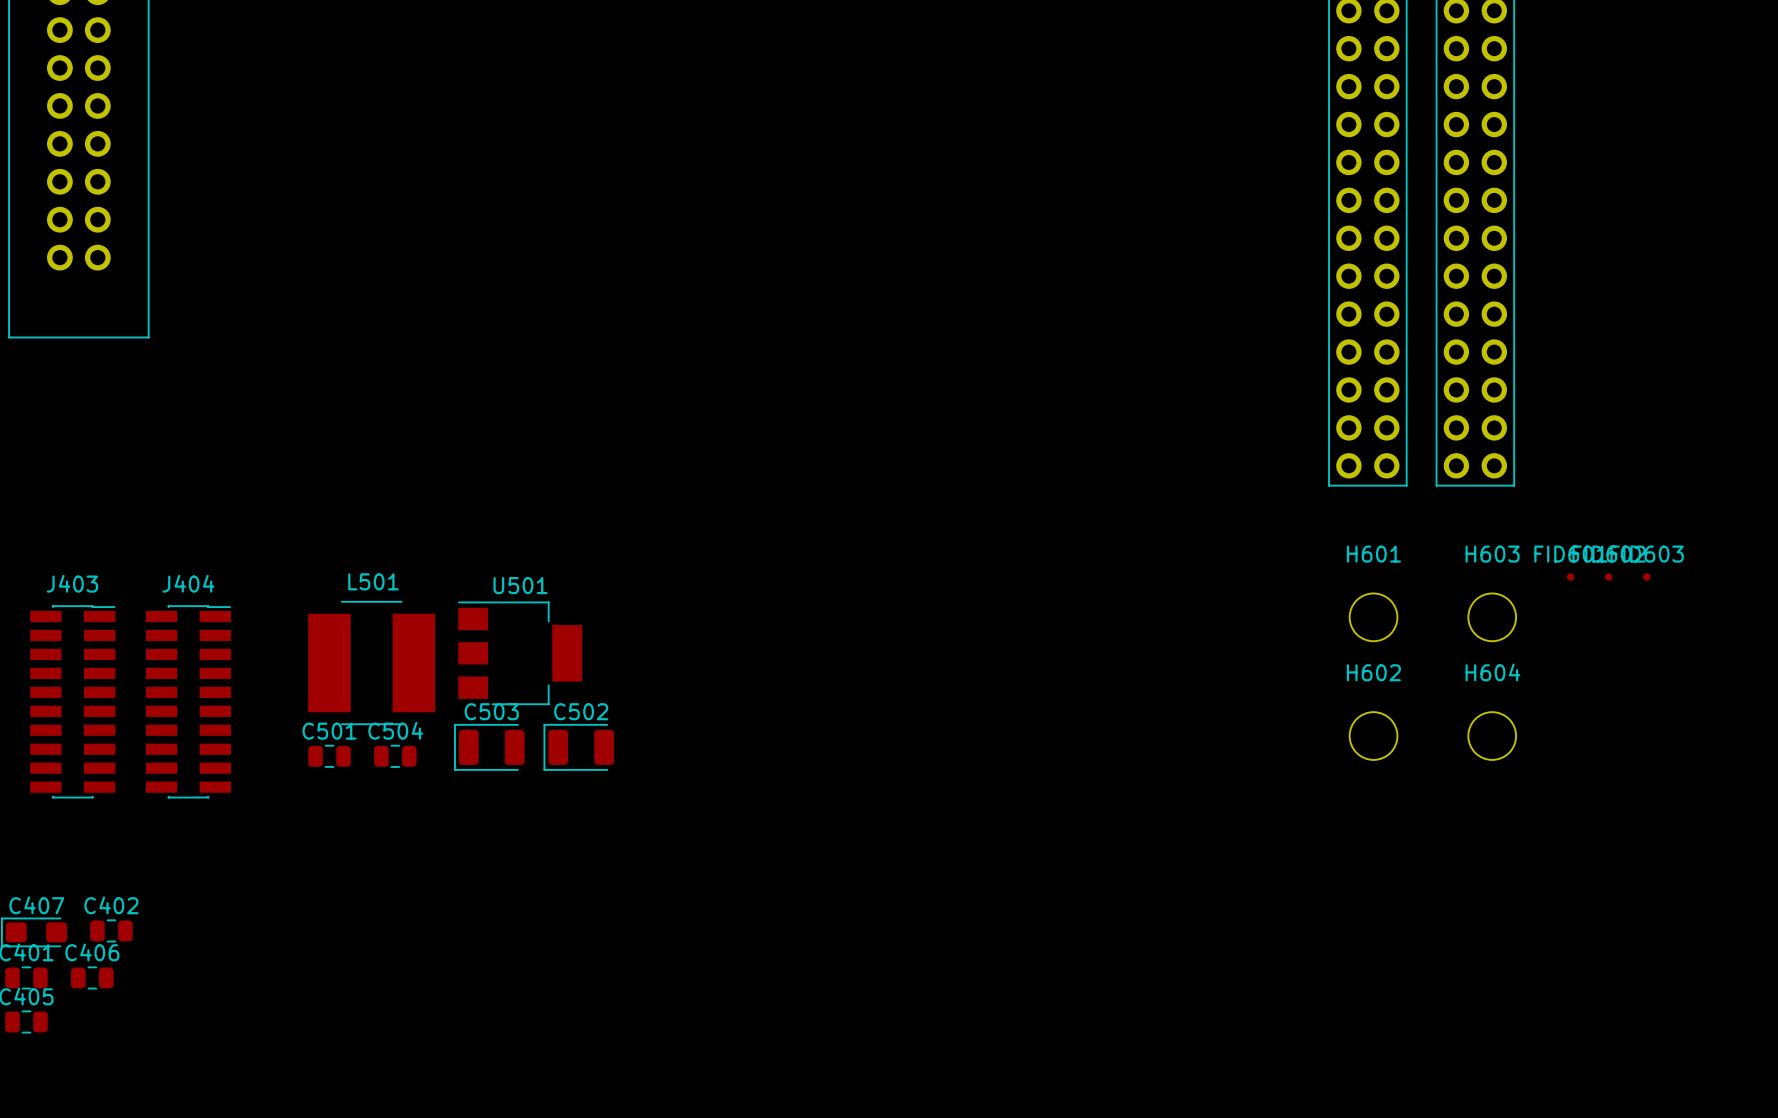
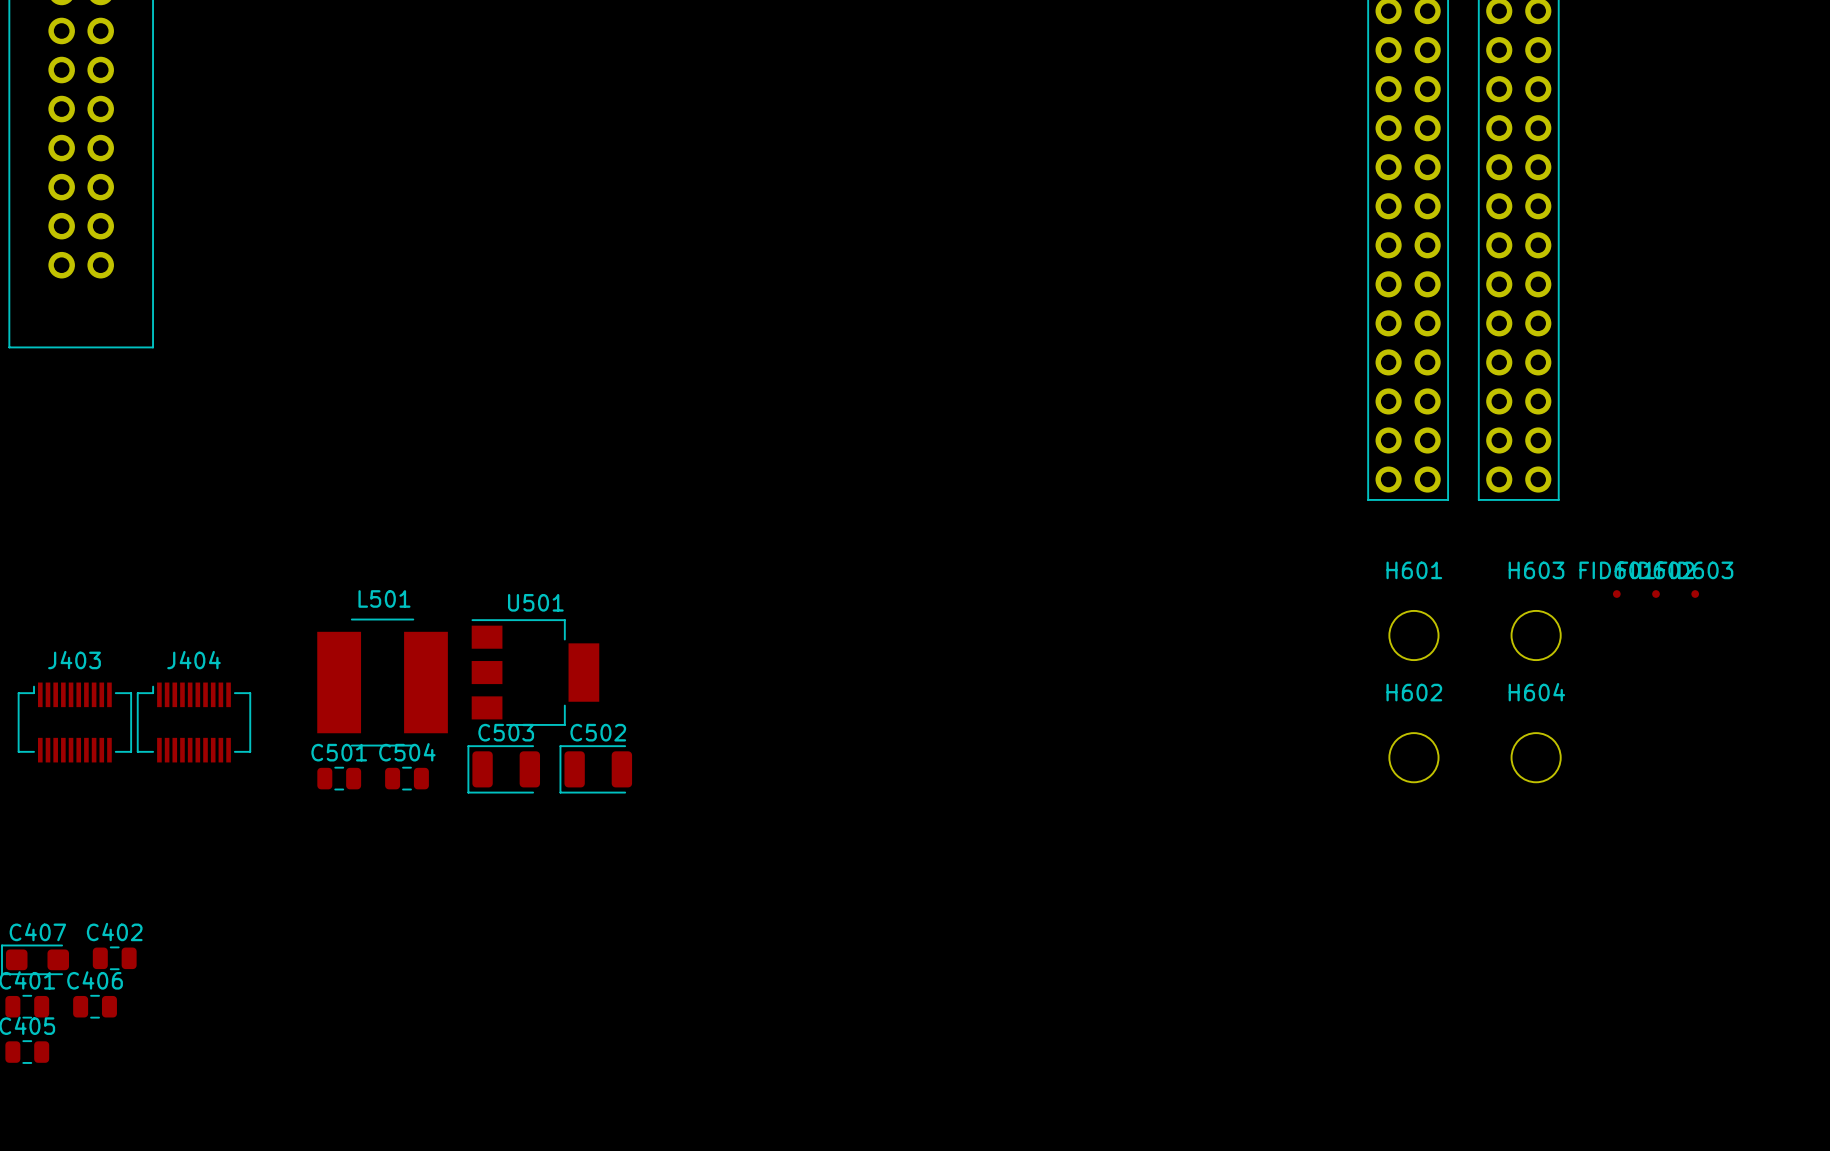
J403 name position: J403 (72, 583) -> J403 (74, 660)
J404 name position: J404 (188, 583) -> J404 (193, 660)
J403 footprint: [30, 605, 116, 799] -> [17, 682, 133, 763]
J404 footprint: [145, 605, 231, 799] -> [136, 682, 252, 763]

